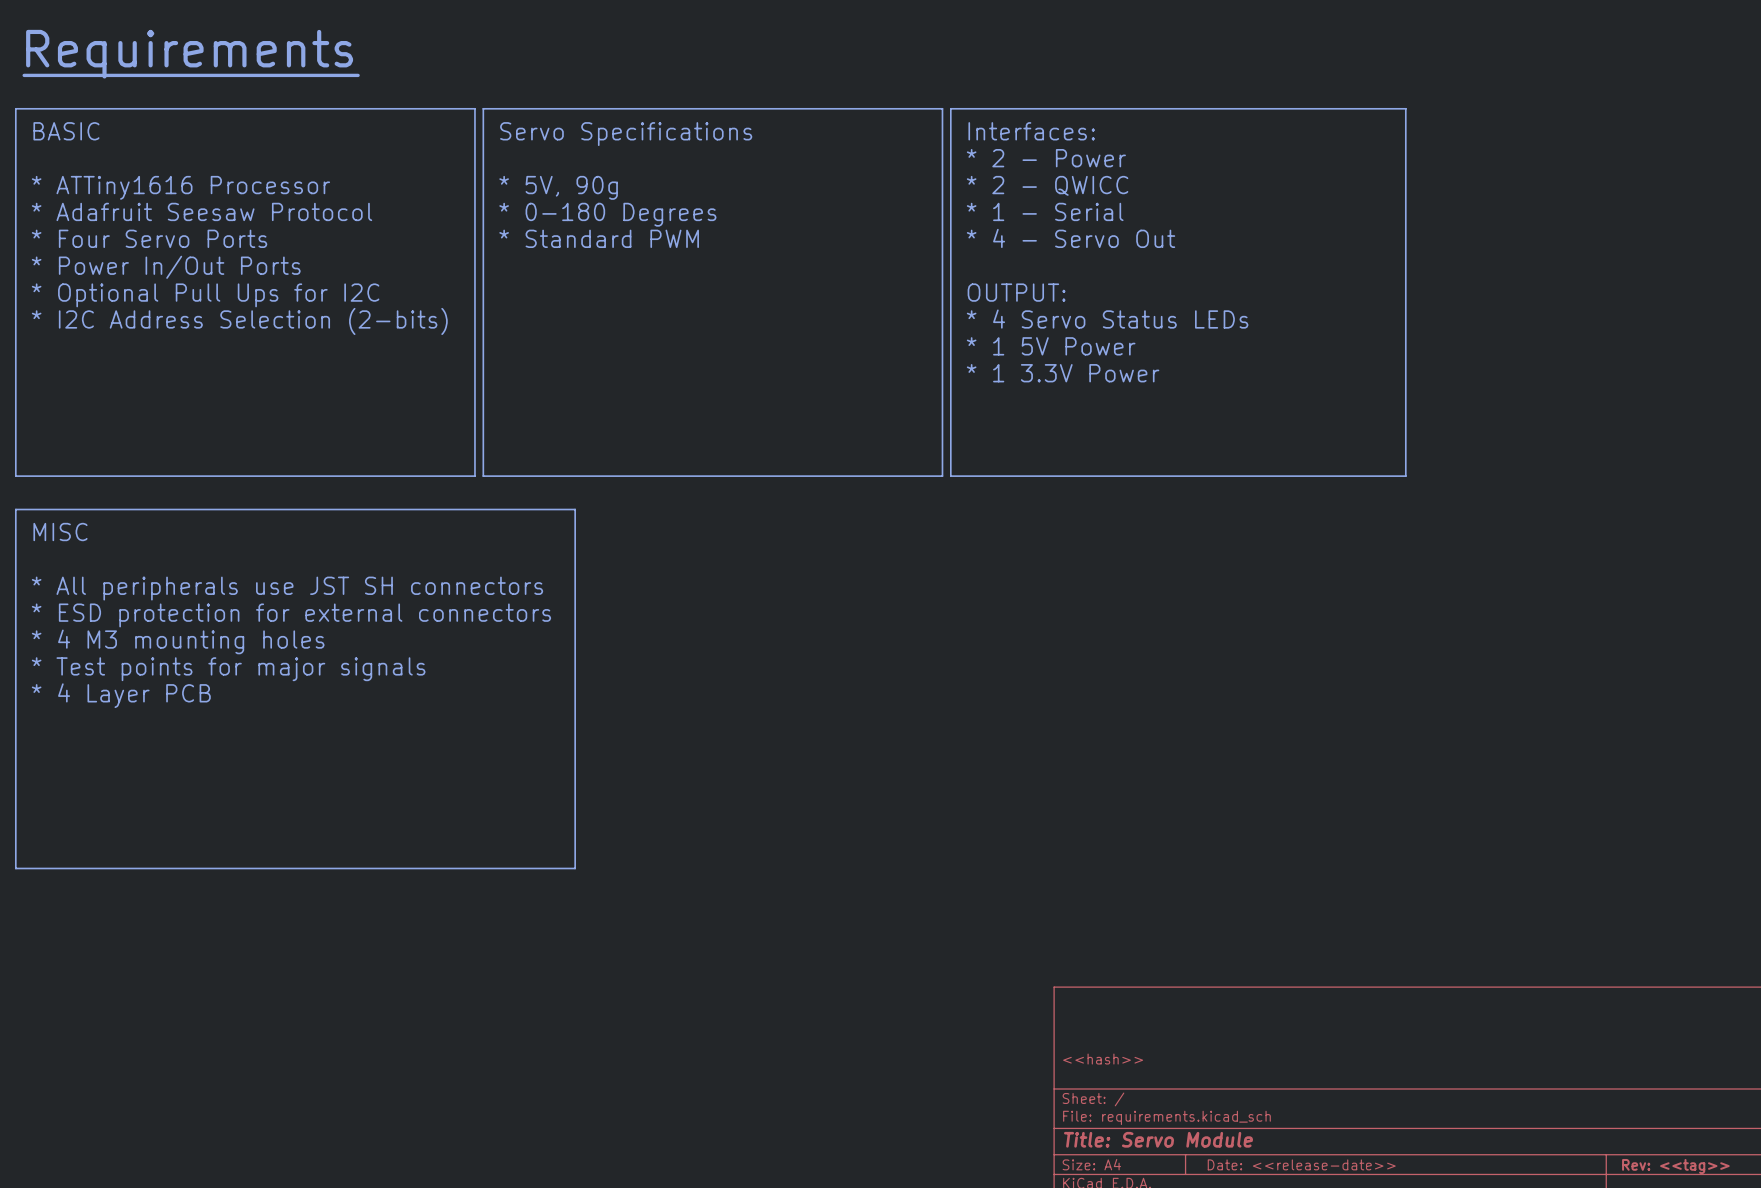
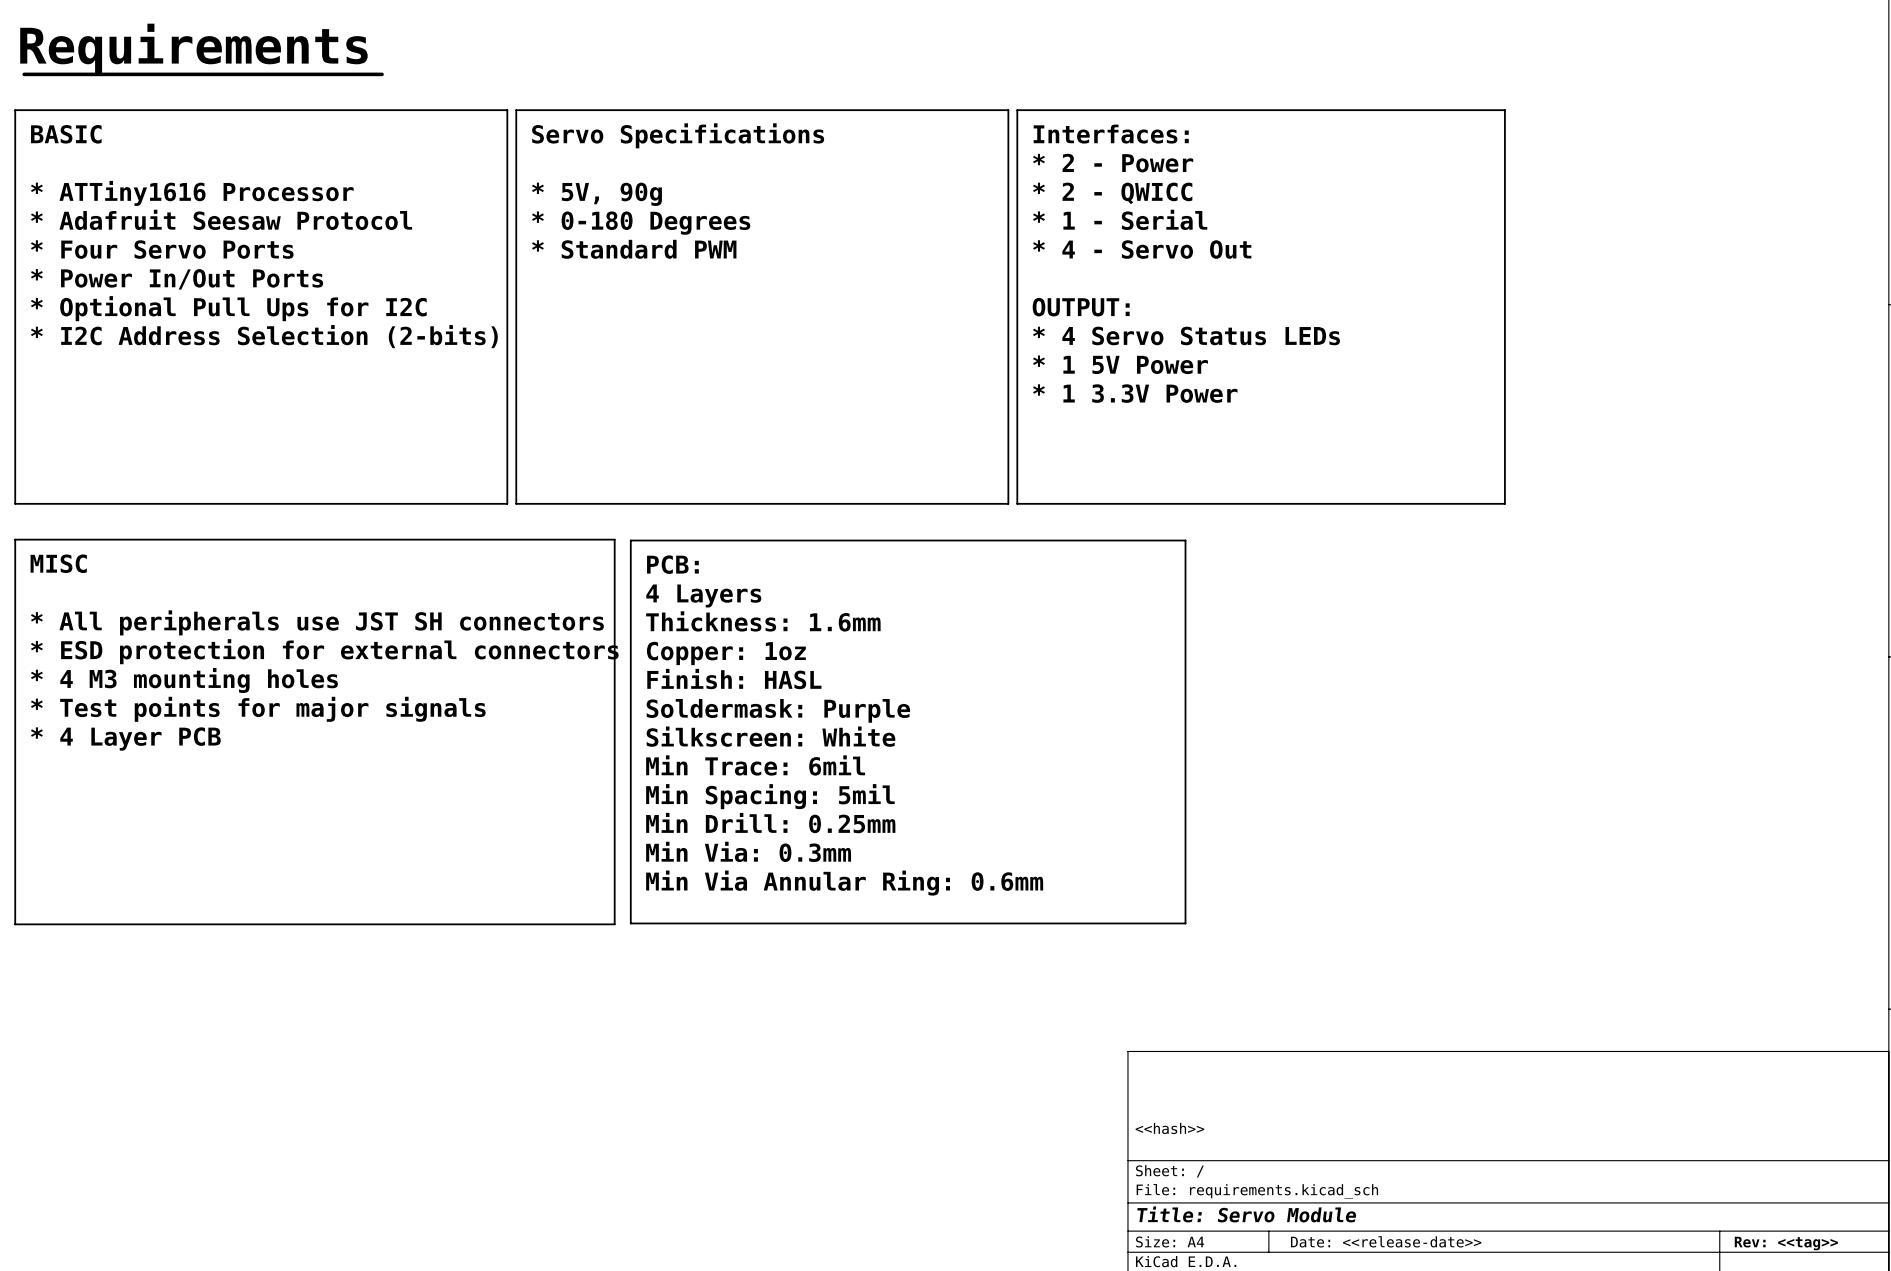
line: none -> (630, 540) (1185, 540) (1185, 923) (630, 923) (630, 540)
text: none -> PCB: (672, 564)
text: none -> 4 Layers (703, 595)
text: none -> Thickness: 1.6mm (763, 621)
text: none -> Copper: 1oz (726, 653)
text: none -> Finish: HASL (734, 679)
text: none -> Soldermask: Purple (778, 710)
text: none -> Silkscreen: White (770, 736)
text: none -> Min Trace: 6mil (755, 765)
text: none -> Min Spacing: 5mil (770, 796)
text: none -> Min Drill: 0.25mm (770, 823)
text: none -> Min Via: 0.3mm (748, 851)
text: none -> Min Via Annular Ring: 0.6mm (844, 883)

